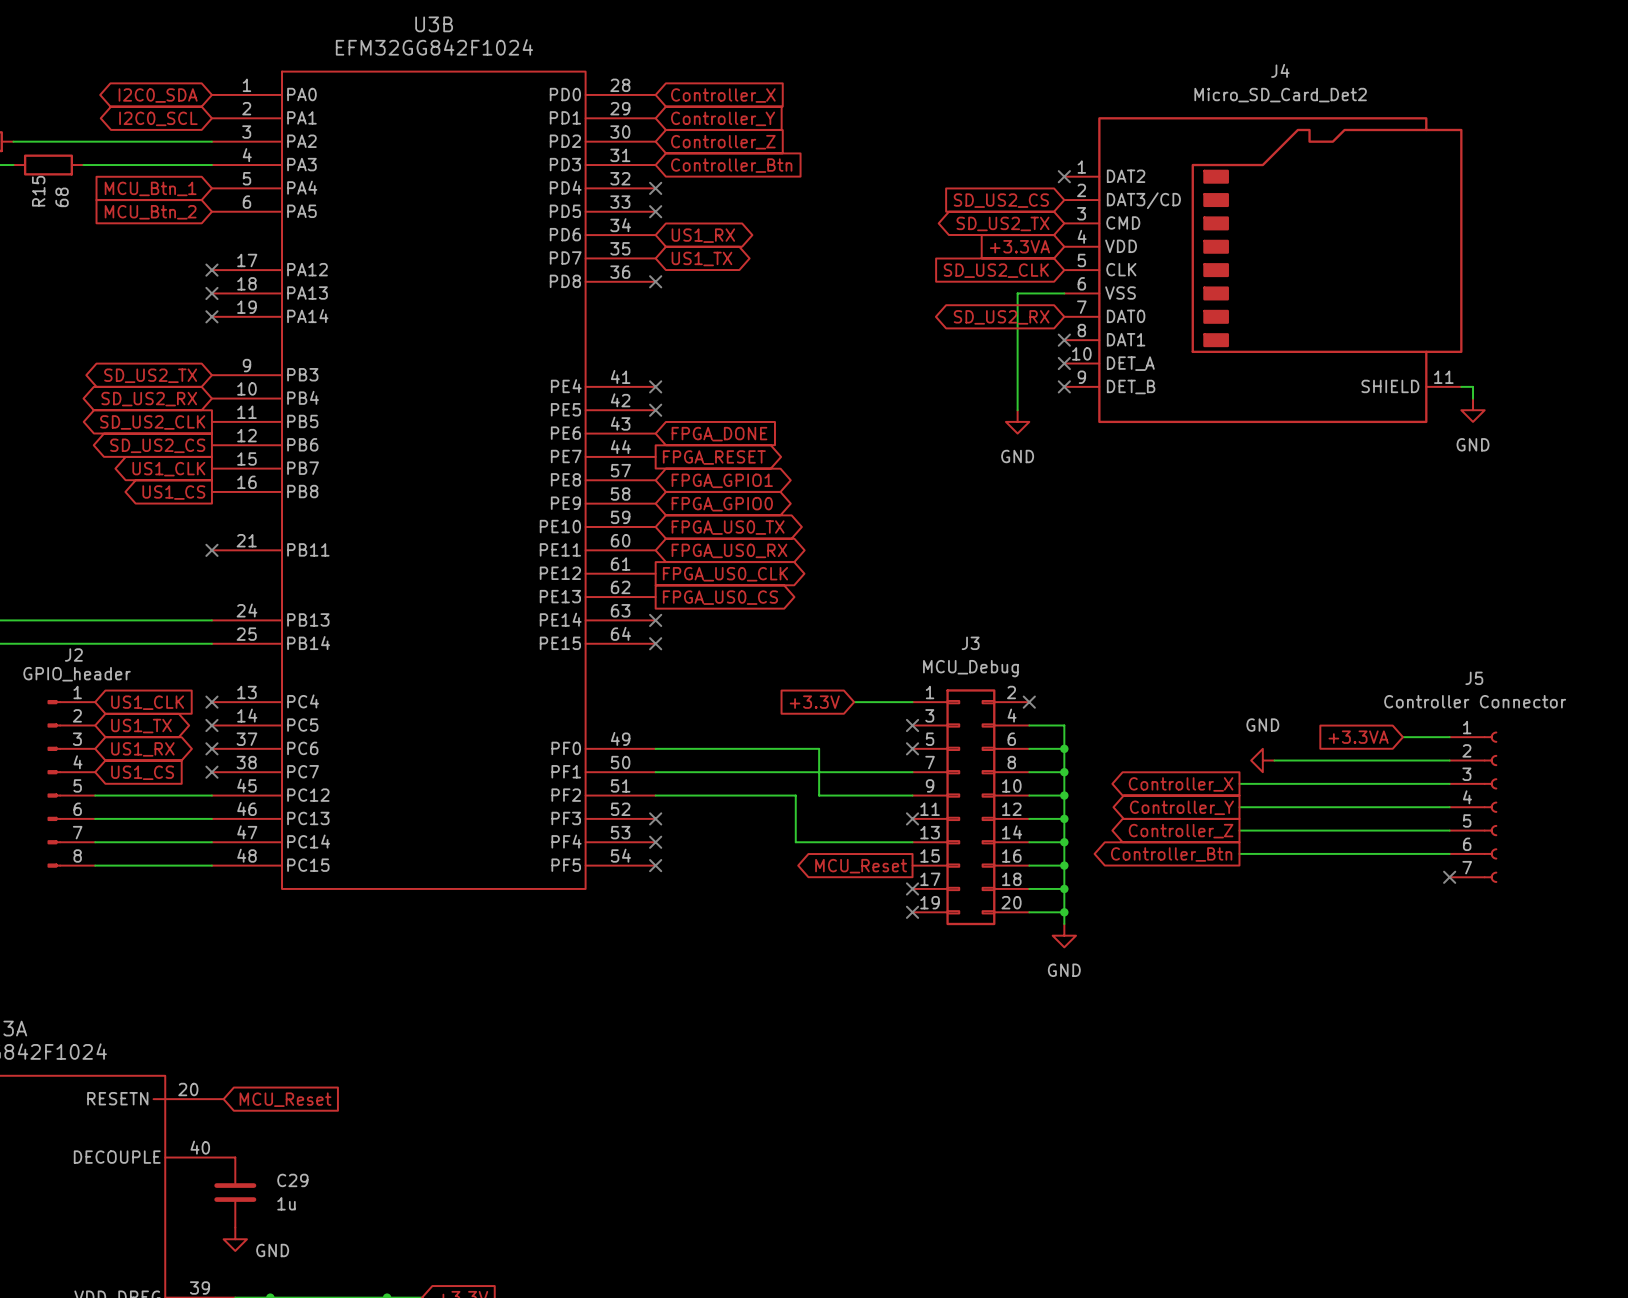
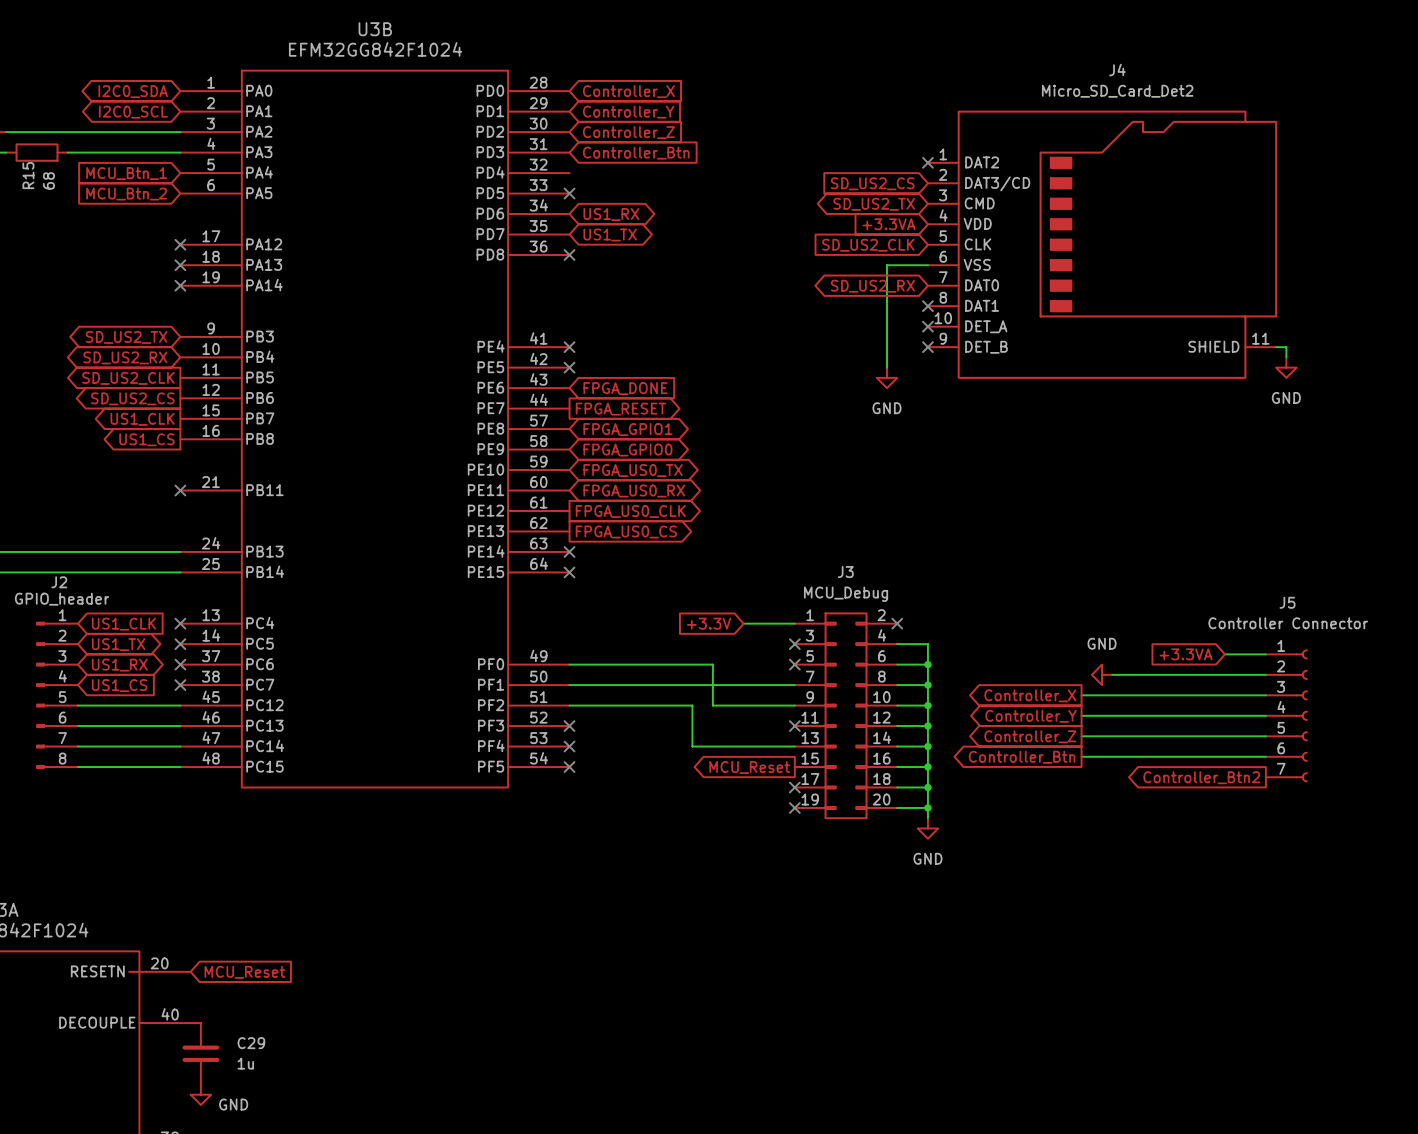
no-connect mark: (655, 188) -> none
global label: none -> Controller_Btn2 (1201, 777)
no-connect mark: (1449, 877) -> none

